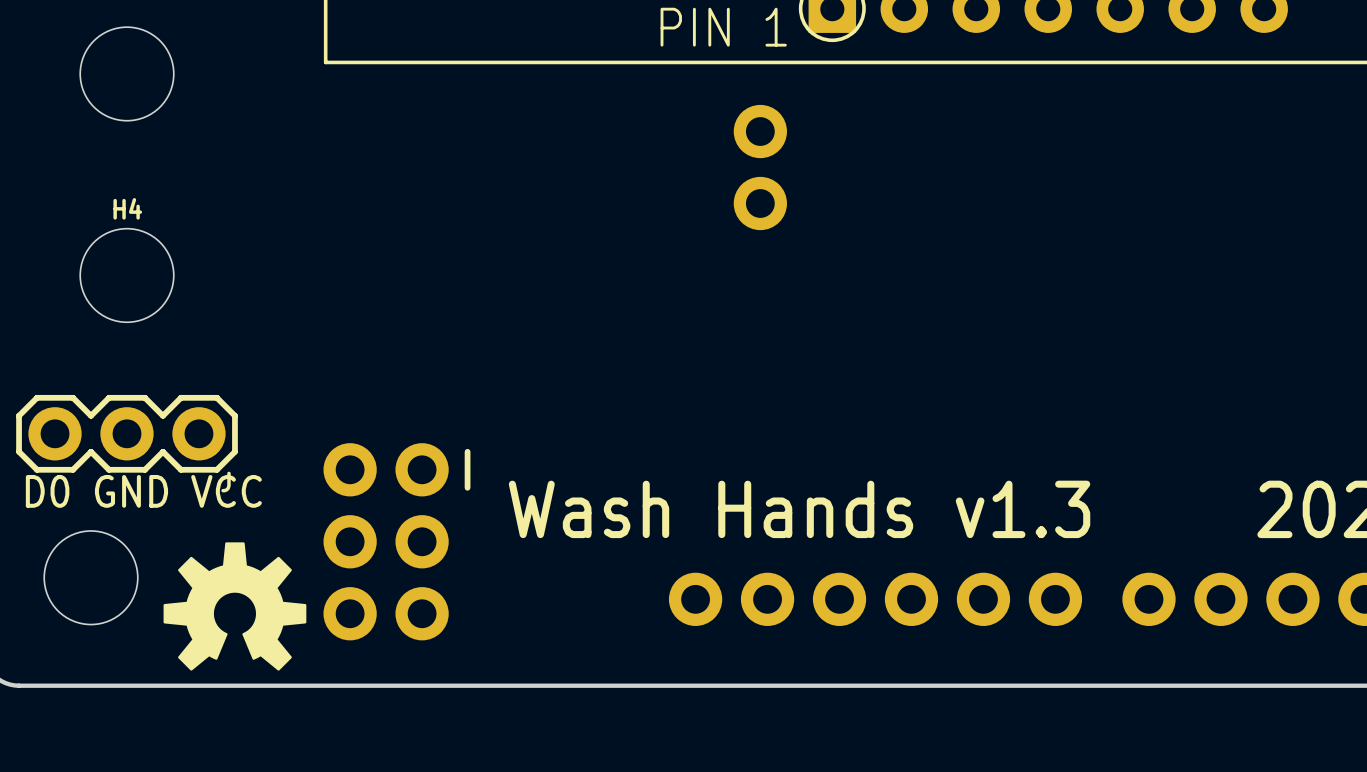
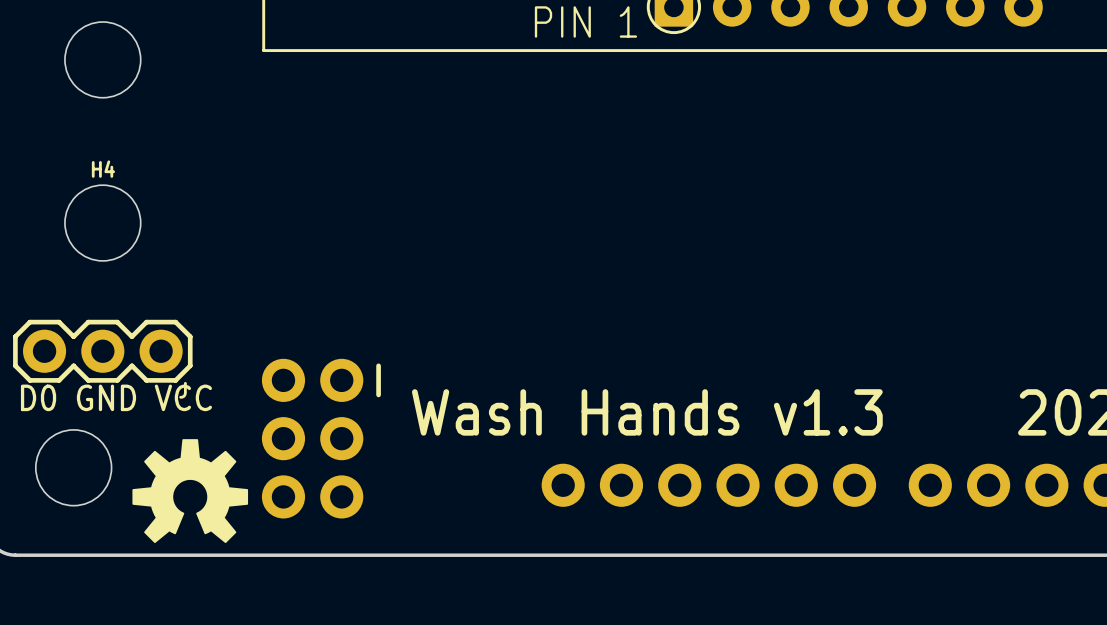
part: (760, 167) -> none

